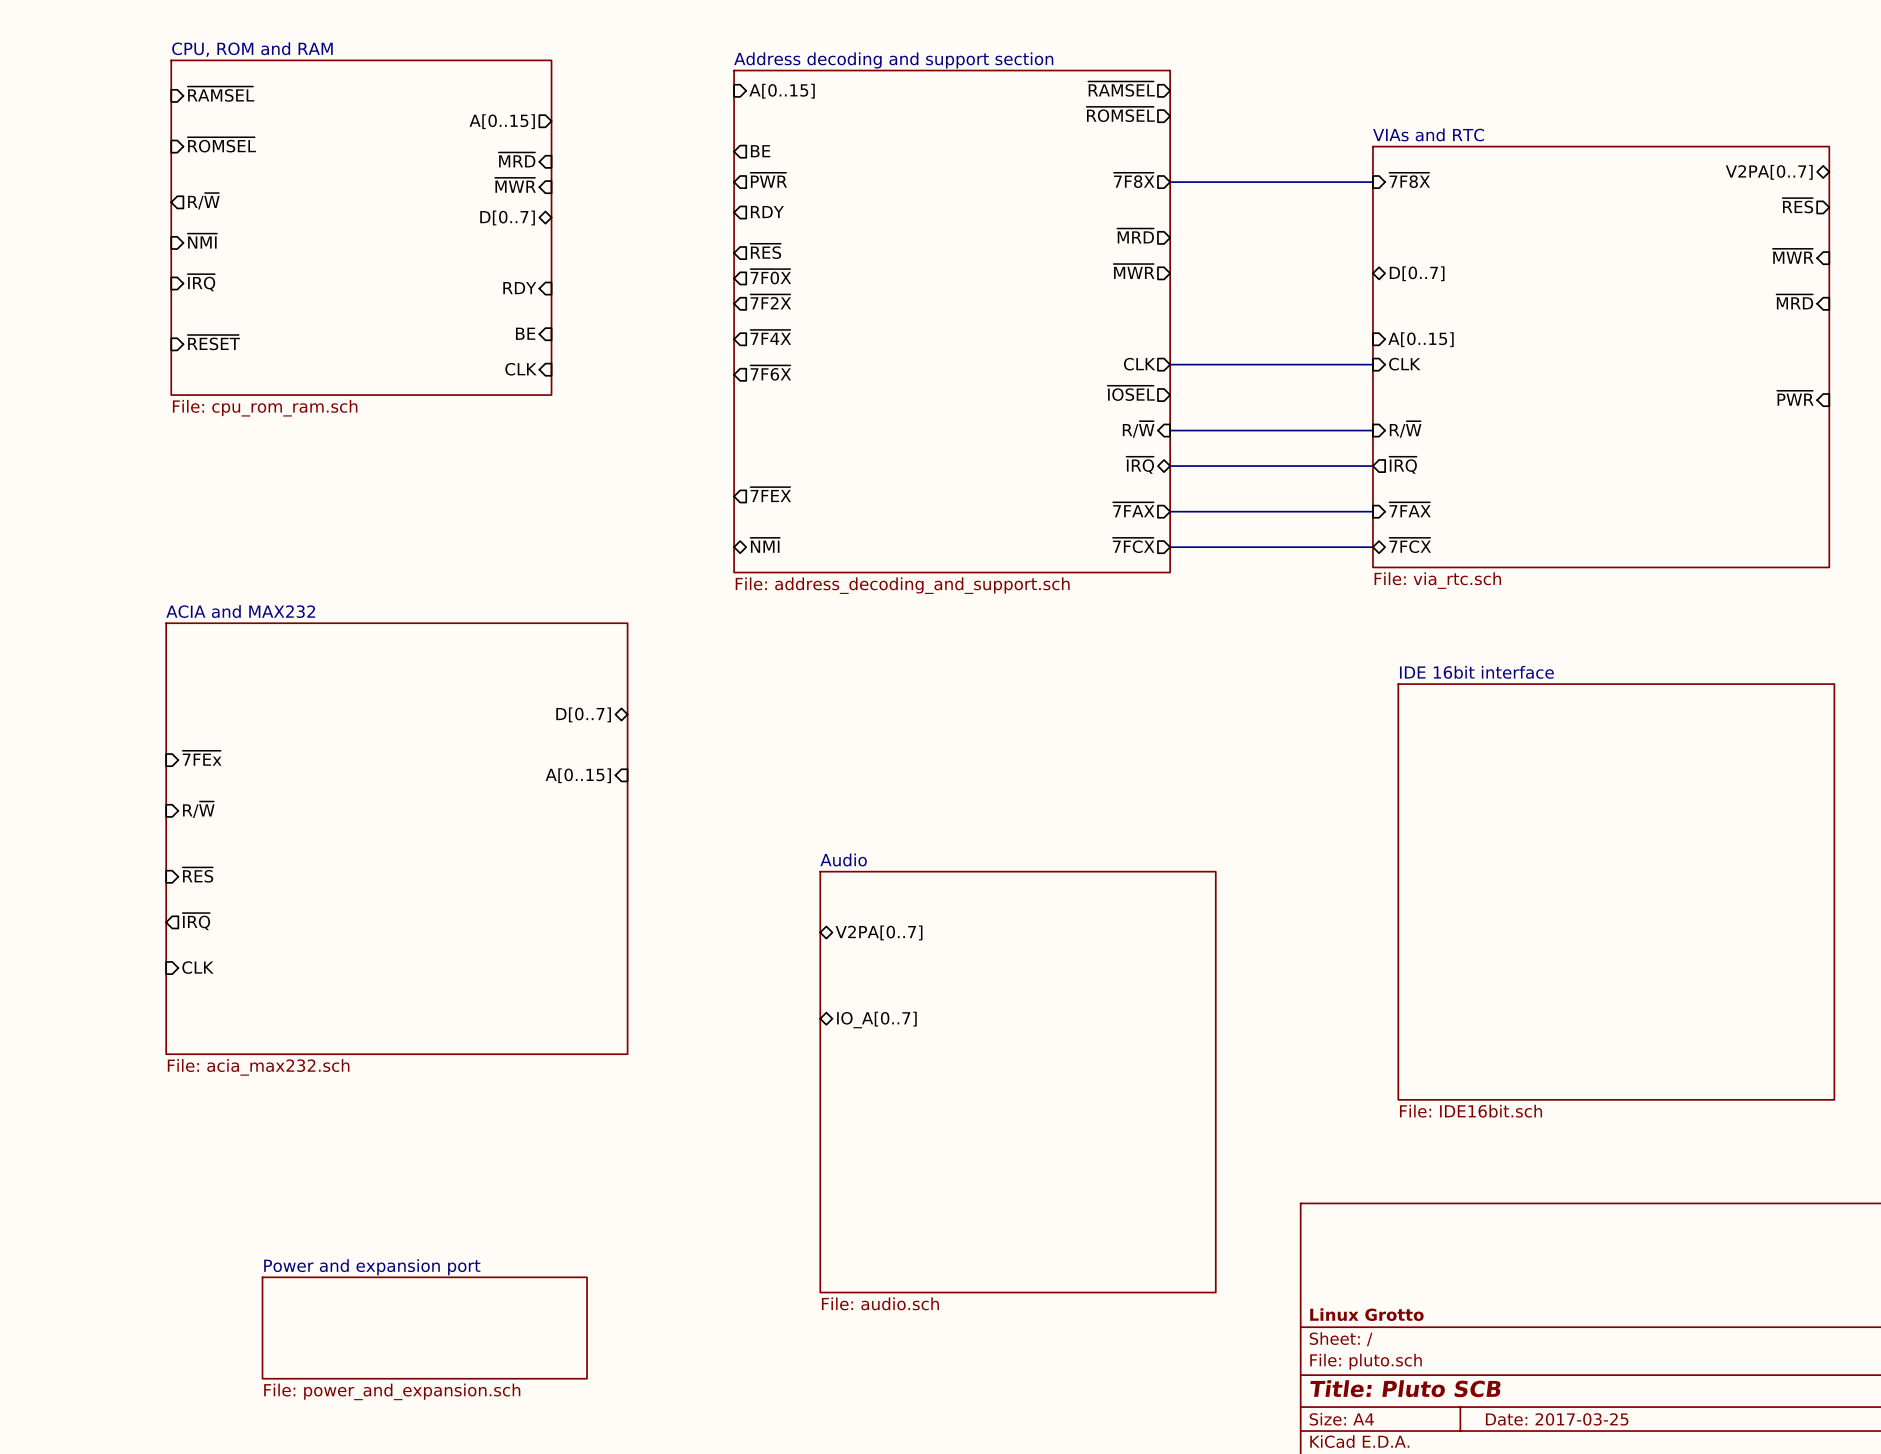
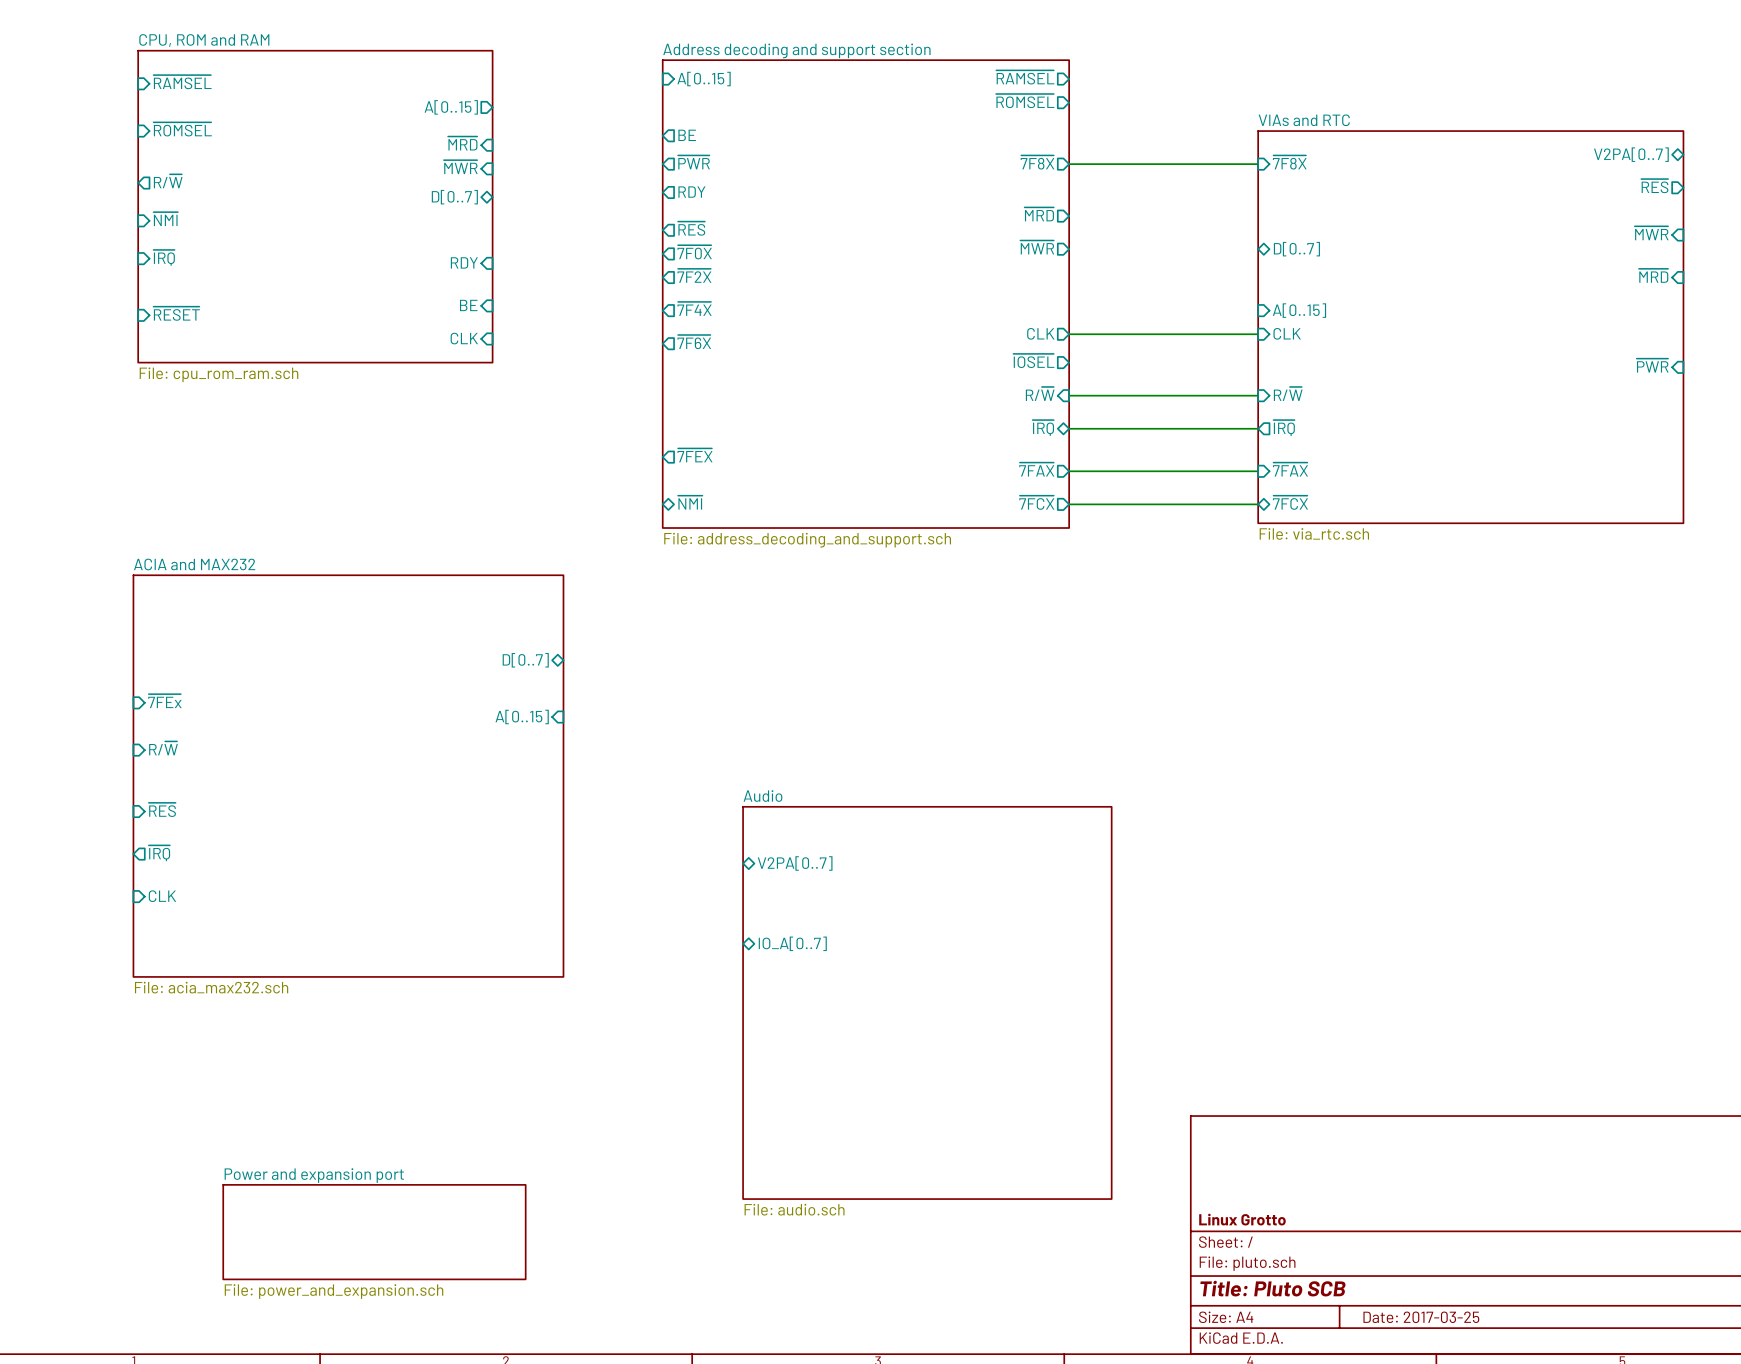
sheet IDE 16bit interface: File: IDE16bit.sch (1616, 891) -> none

